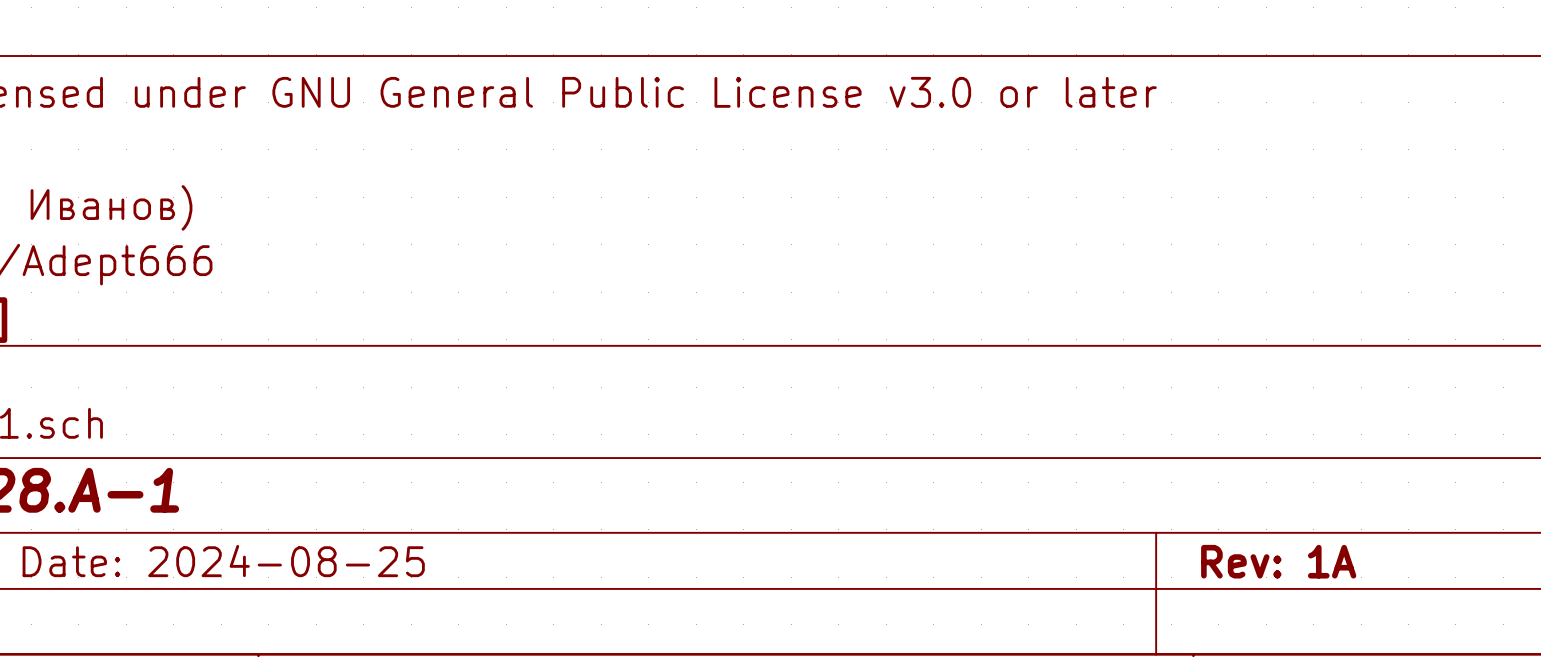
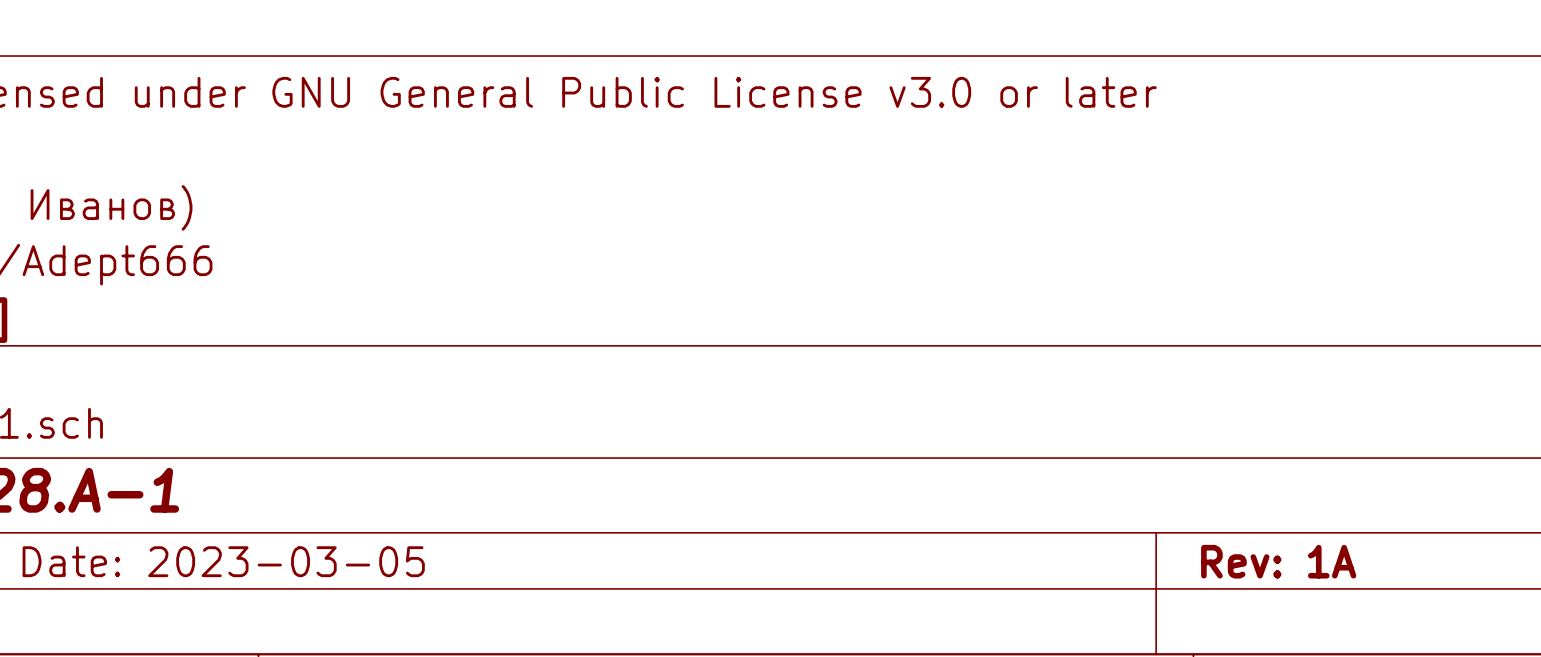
title block: Date: 2024-08-25 (223, 561) -> Date: 2023-03-05 (223, 561)

